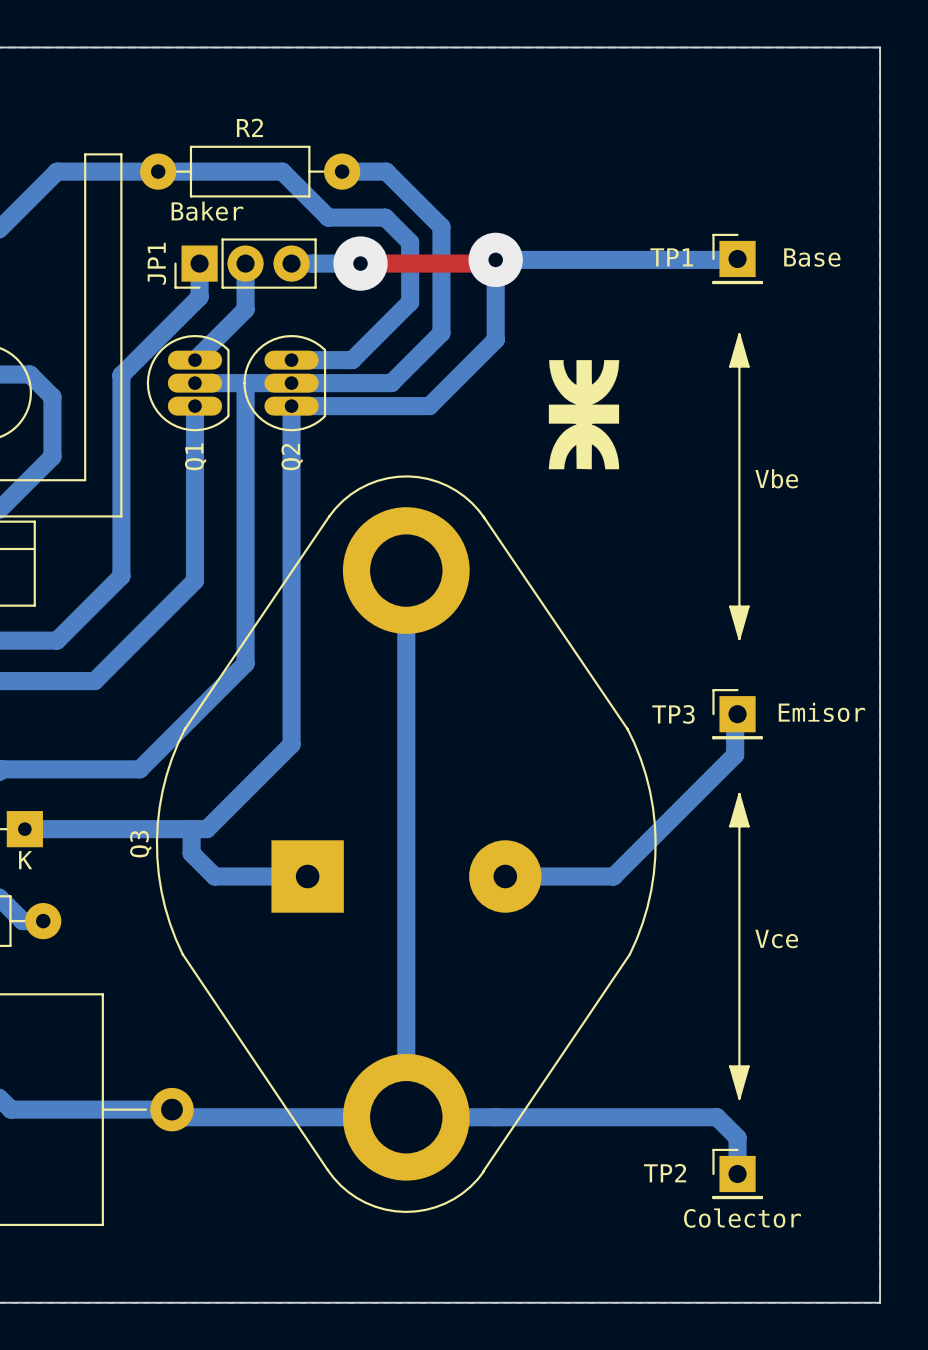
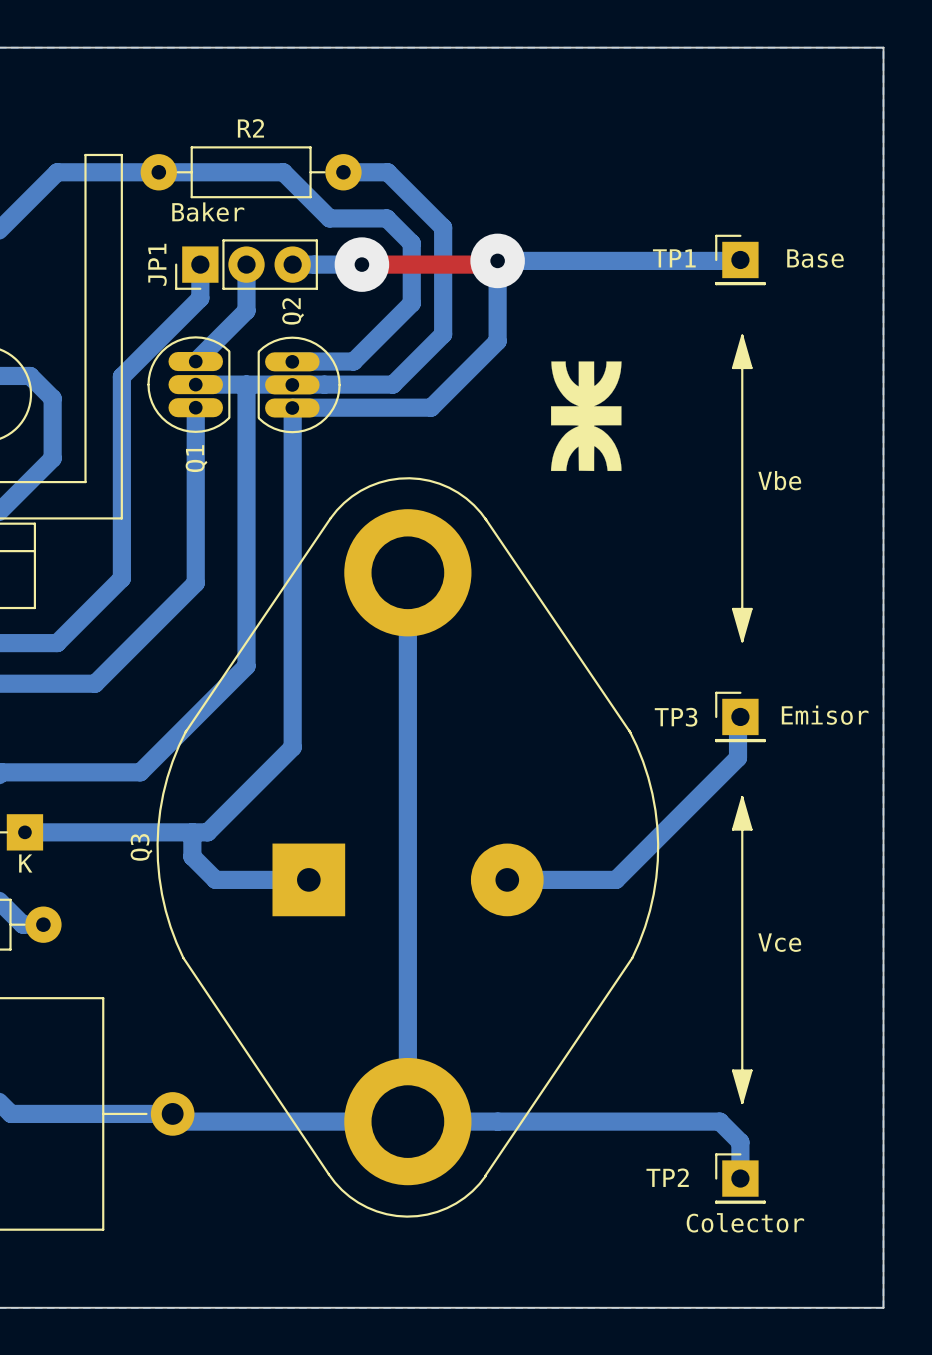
Q2 rotation: 0° (284, 383) -> 180° (299, 384)

